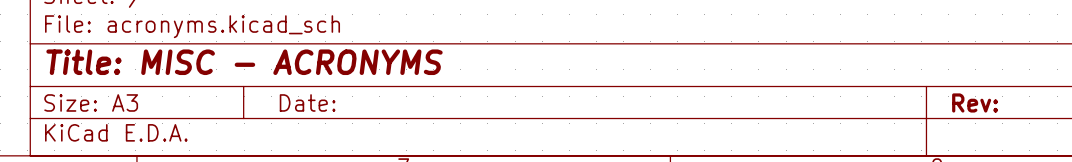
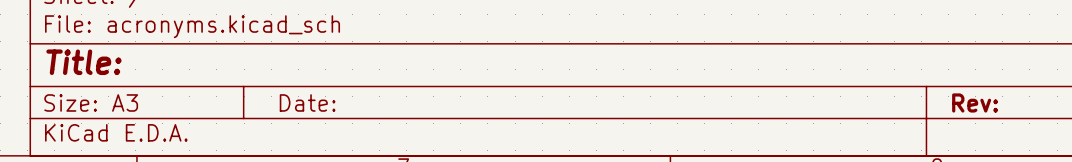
title block: Title: MISC - ACRONYMS (244, 62) -> Title: (83, 62)

